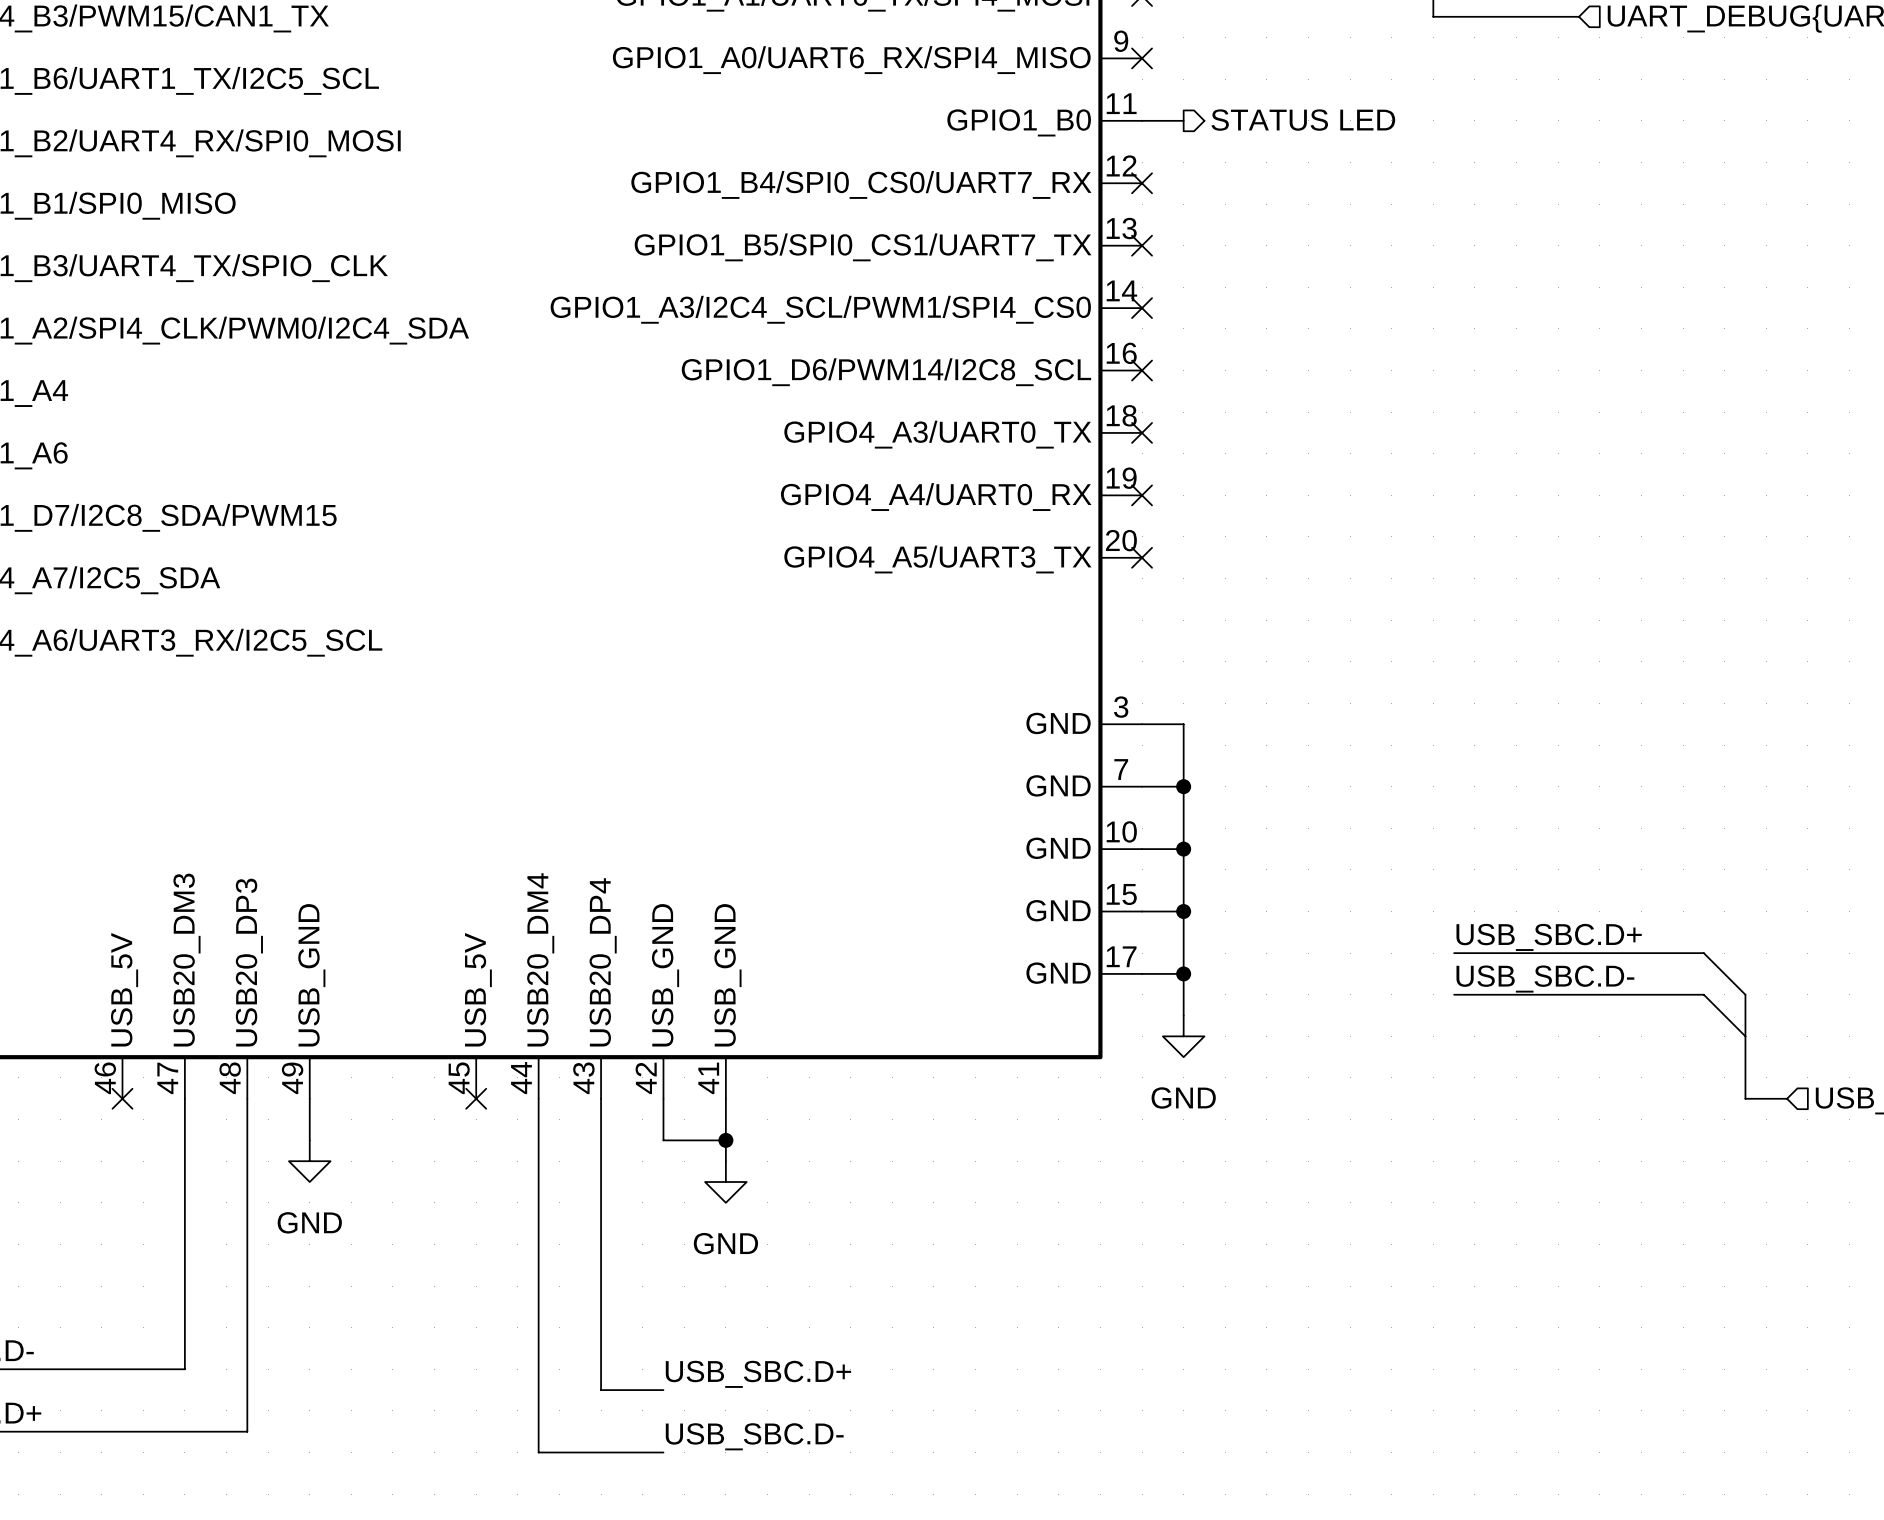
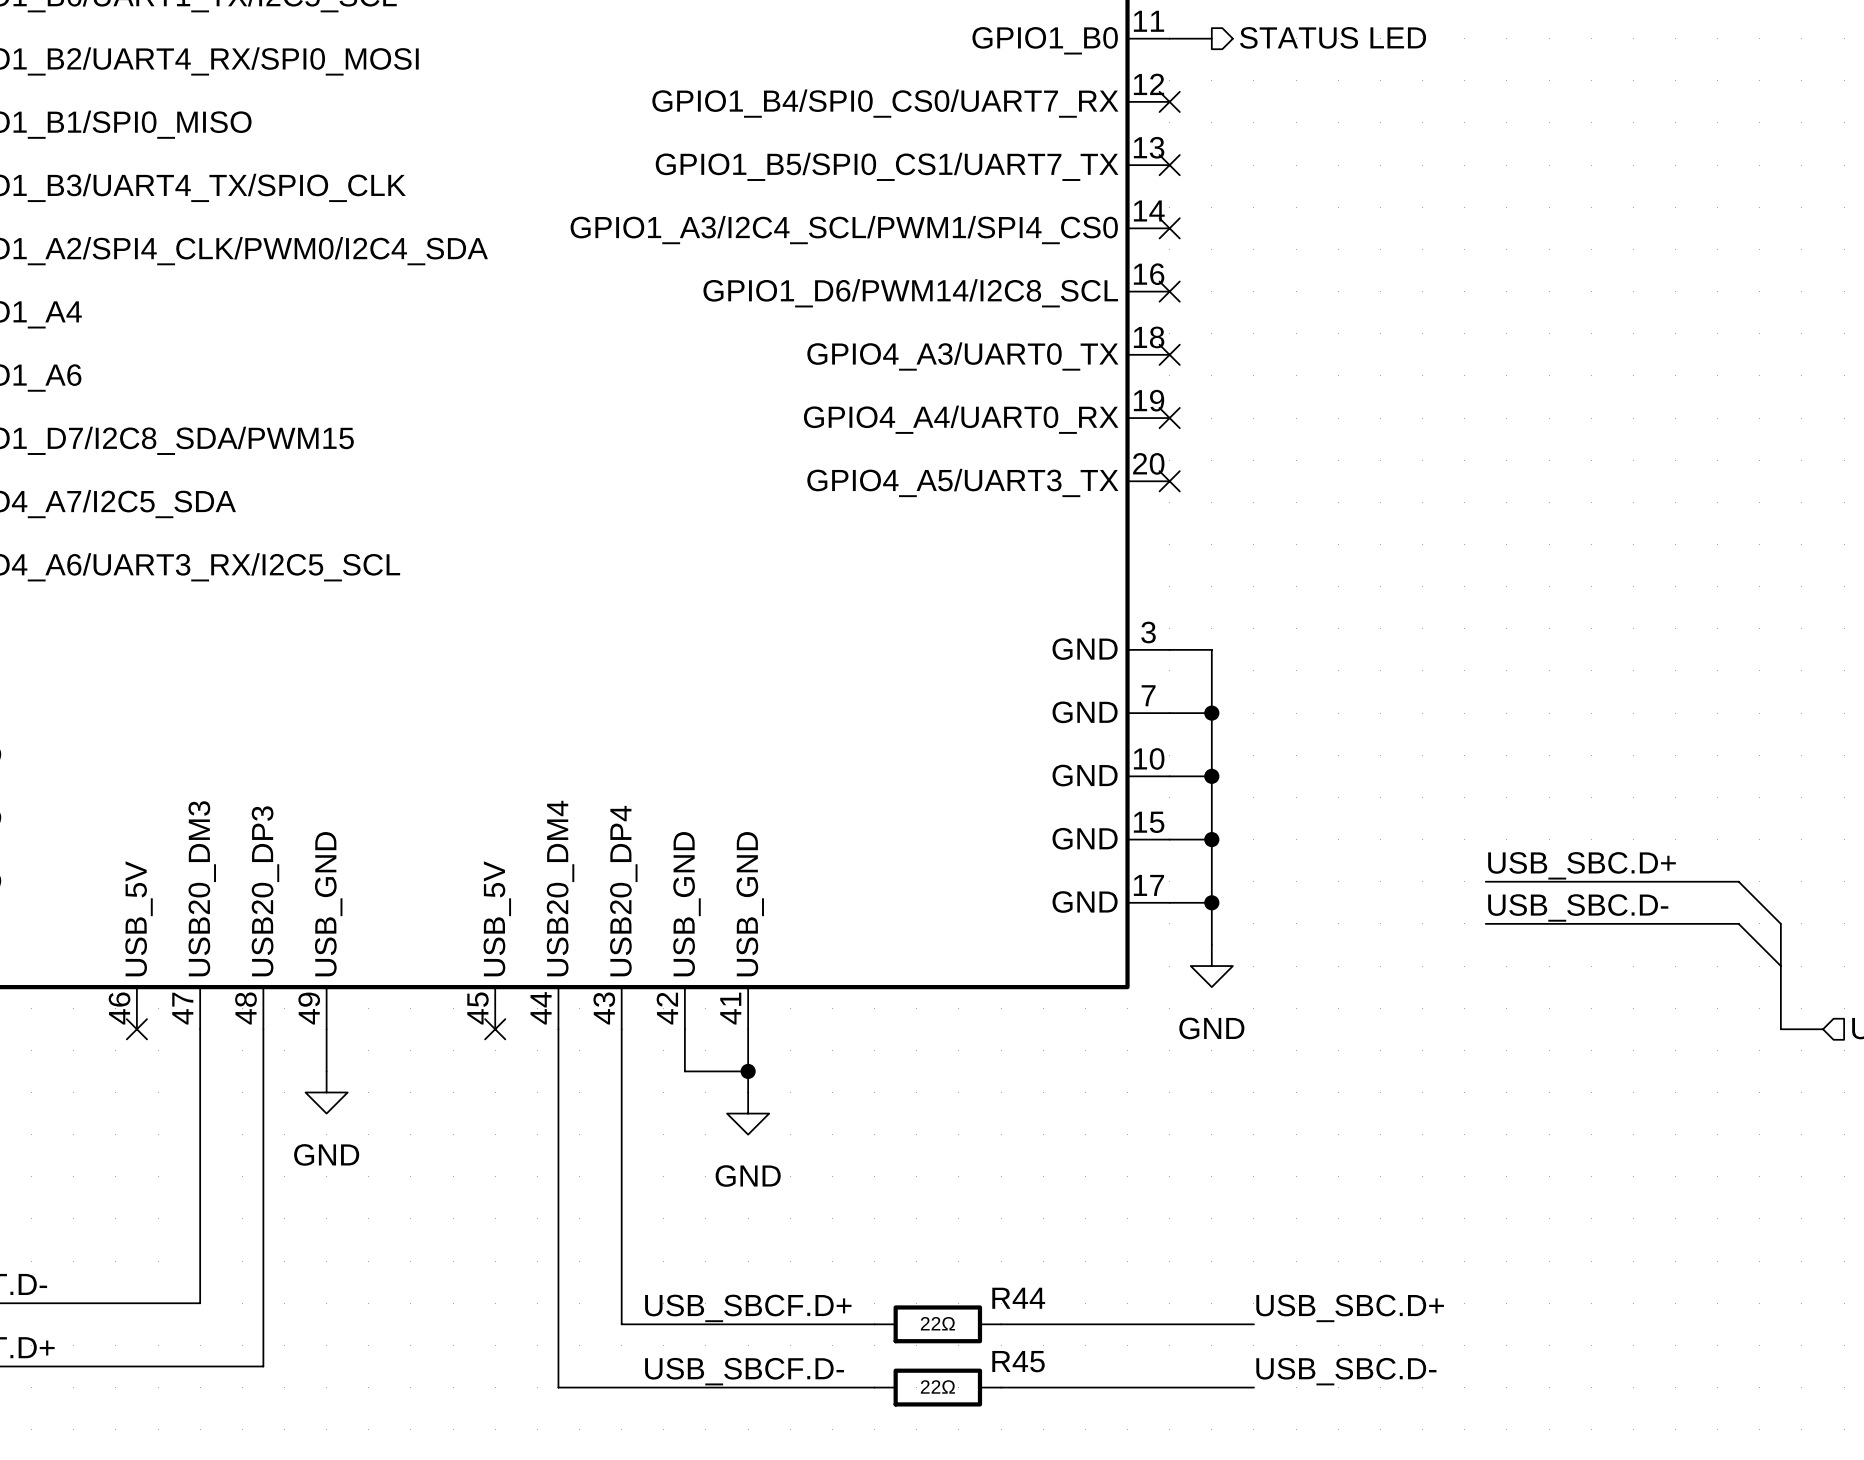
label: USB_SBC.D+ (758, 1374) -> USB_SBCF.D+ (748, 1308)
label: none -> USB_SBC.D+ (1350, 1308)
wire: none -> (684, 1324) (874, 1324)
R44: none -> 22Ω (937, 1324)
wire: none -> (1001, 1324) (1253, 1324)
label: USB_SBC.D- (754, 1436) -> USB_SBCF.D- (744, 1371)
label: none -> USB_SBC.D- (1346, 1371)
wire: none -> (684, 1387) (874, 1387)
R45: none -> 22Ω (937, 1387)
wire: none -> (1001, 1387) (1253, 1387)

